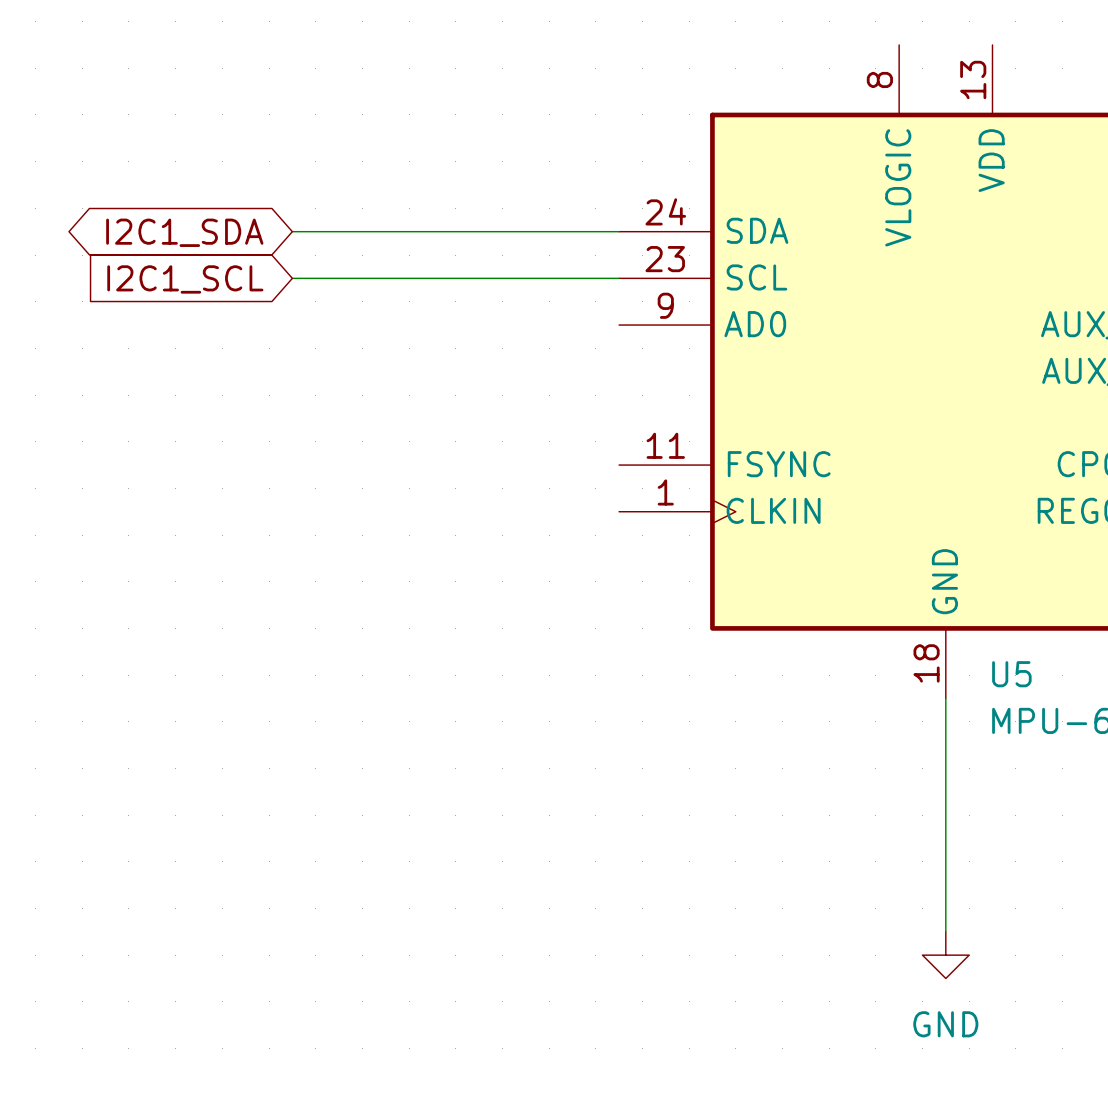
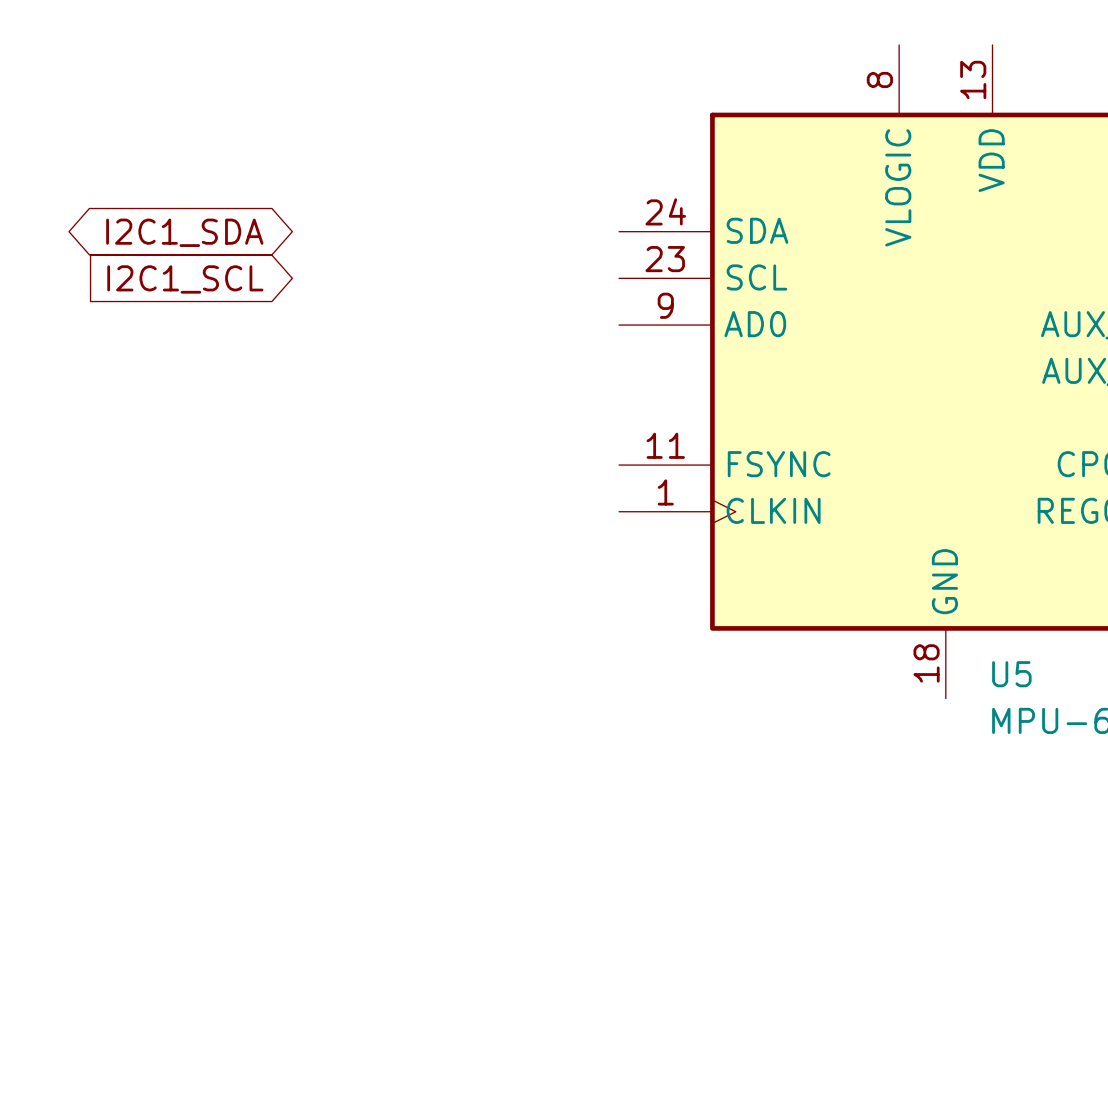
wire: (292, 231) (619, 231) -> none
wire: (292, 278) (619, 278) -> none
wire: (945, 698) (945, 931) -> none
power symbol: GND (945, 955) -> none

